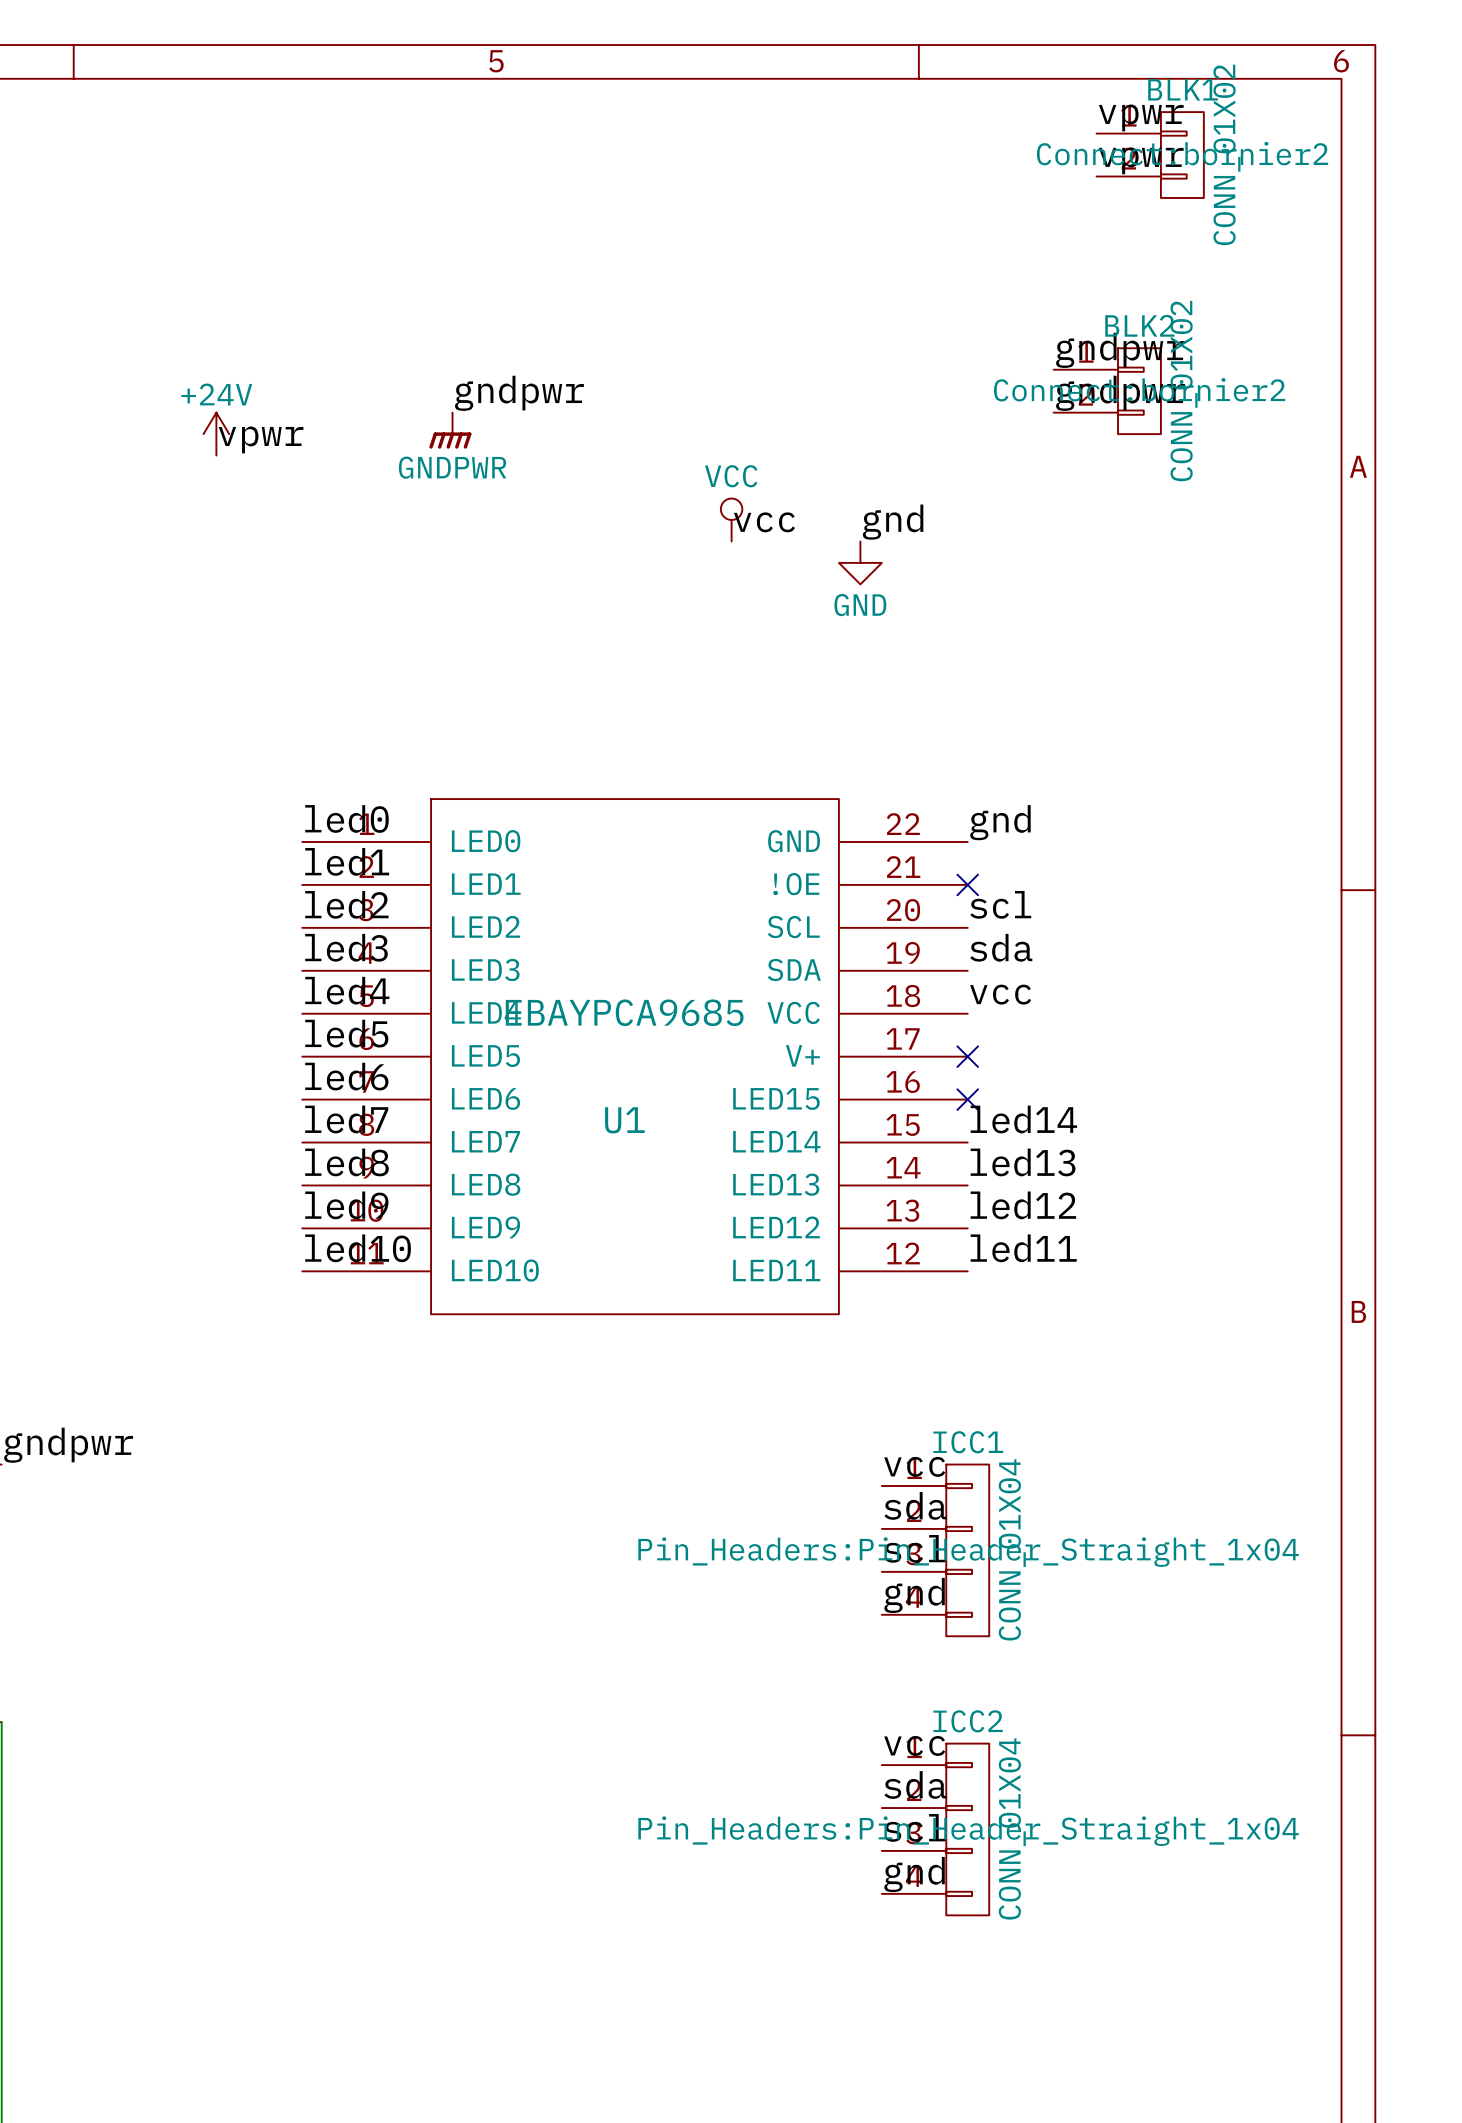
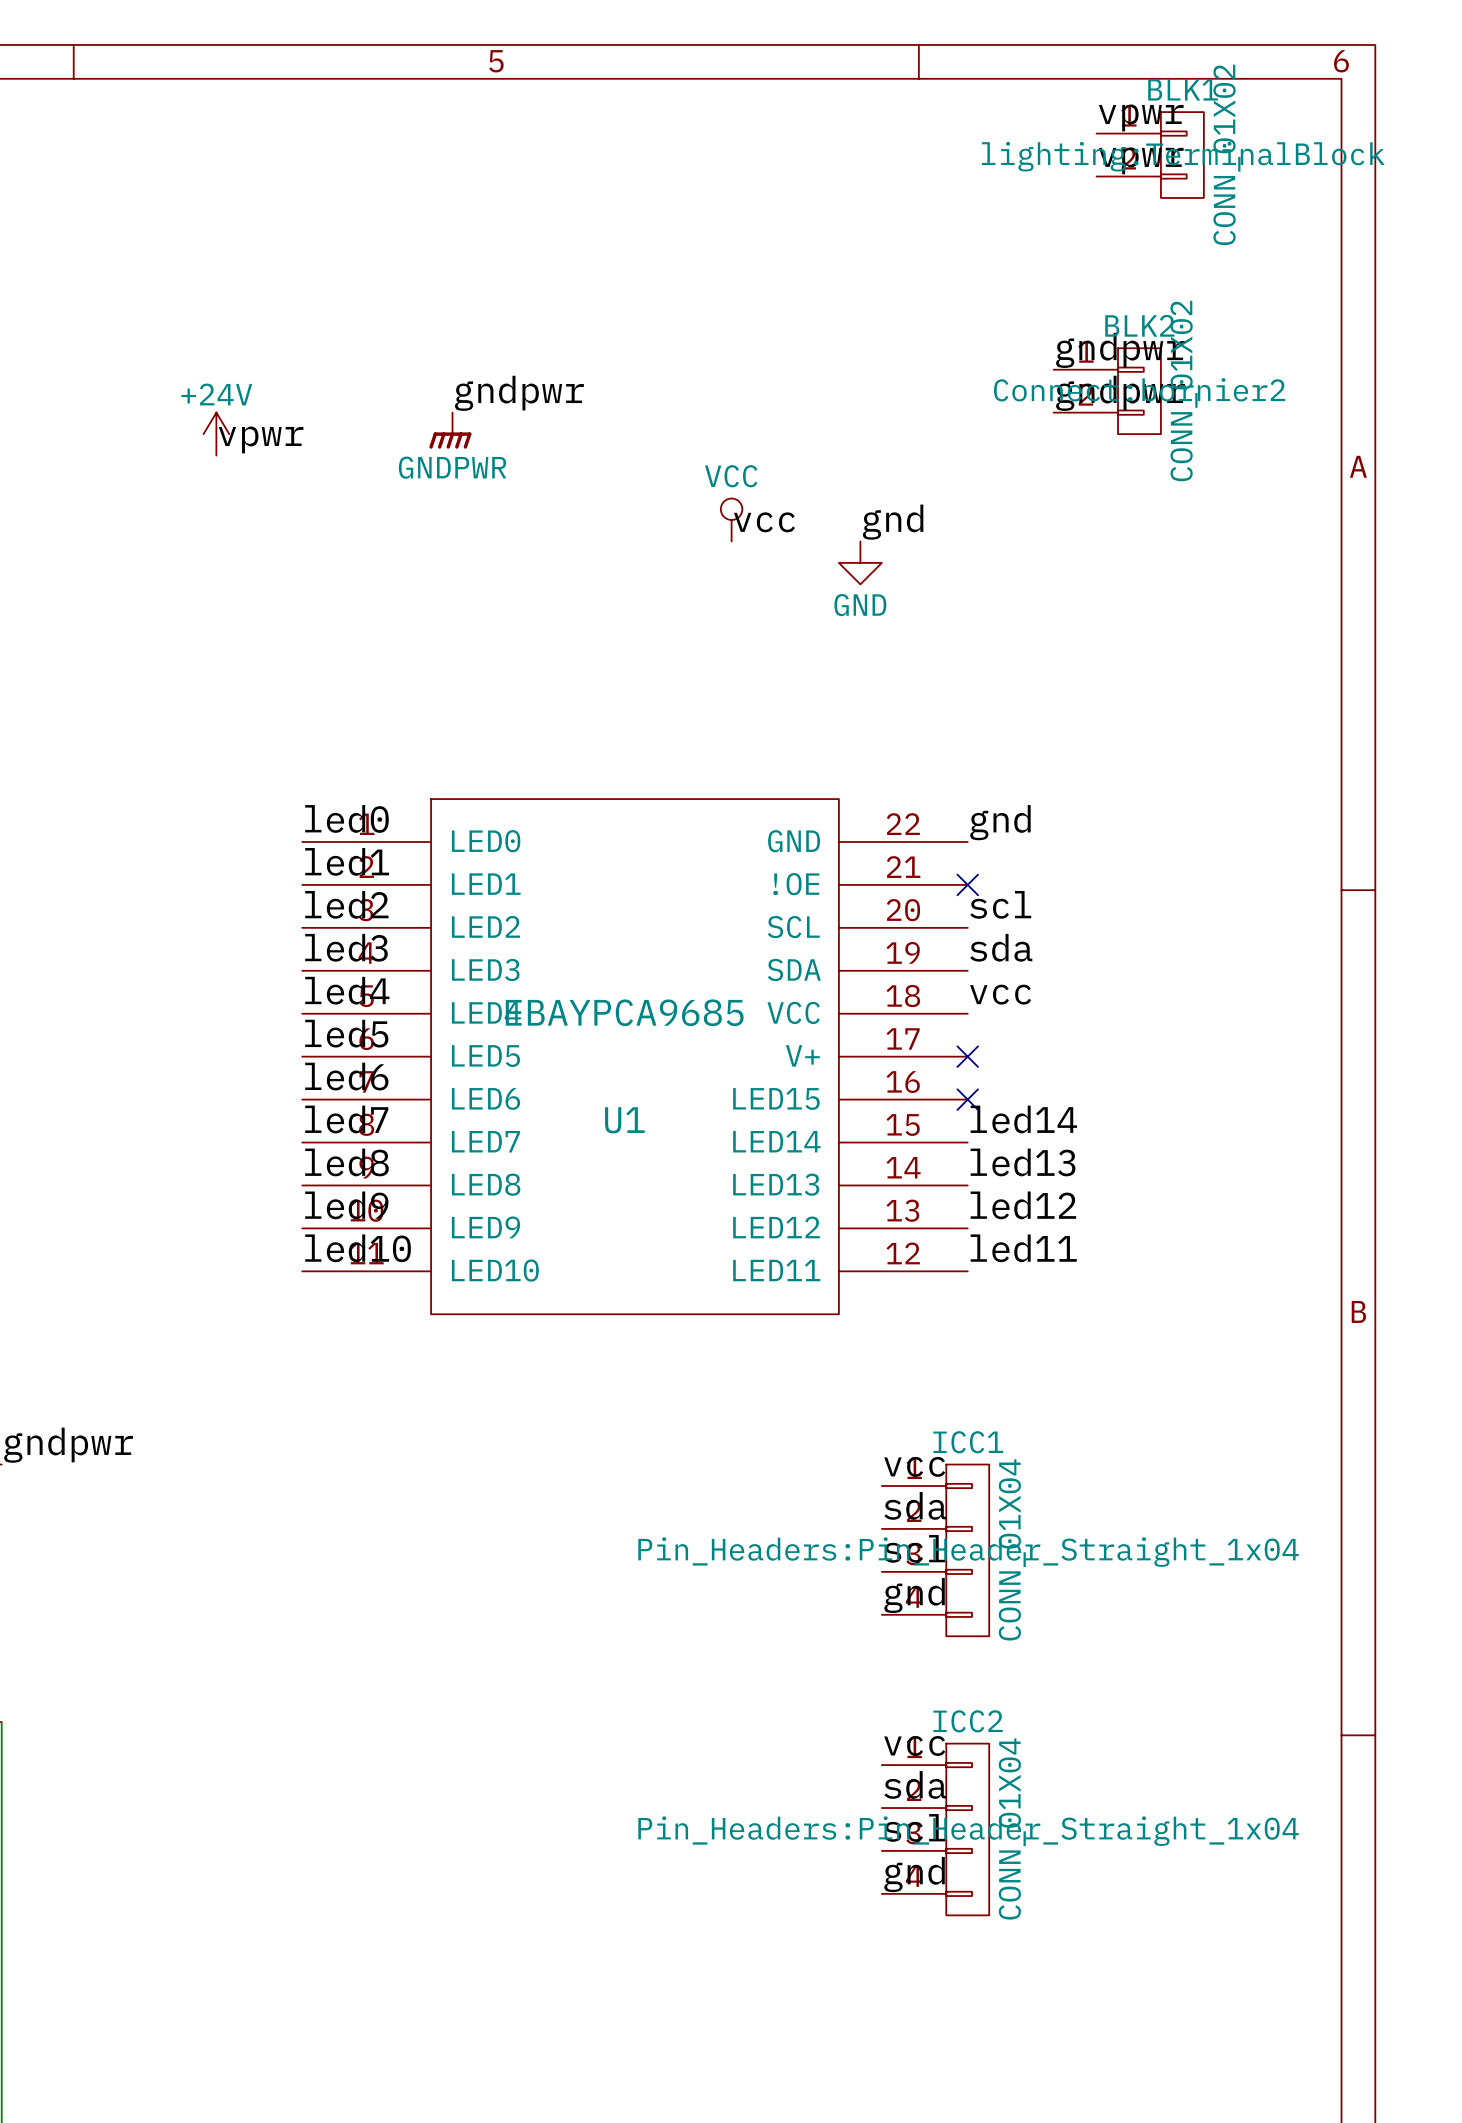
BLK1 text: Connect:bornier2 (1182, 153) -> lighting:TerminalBlock (1183, 156)

